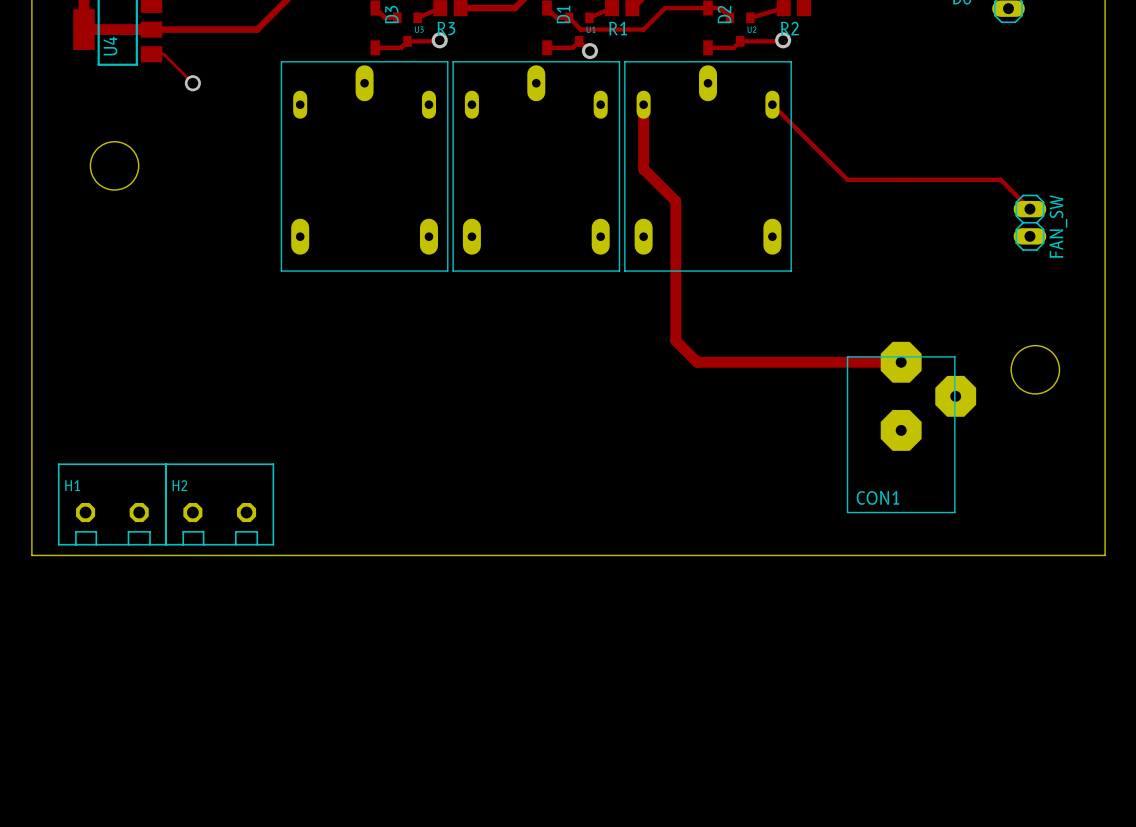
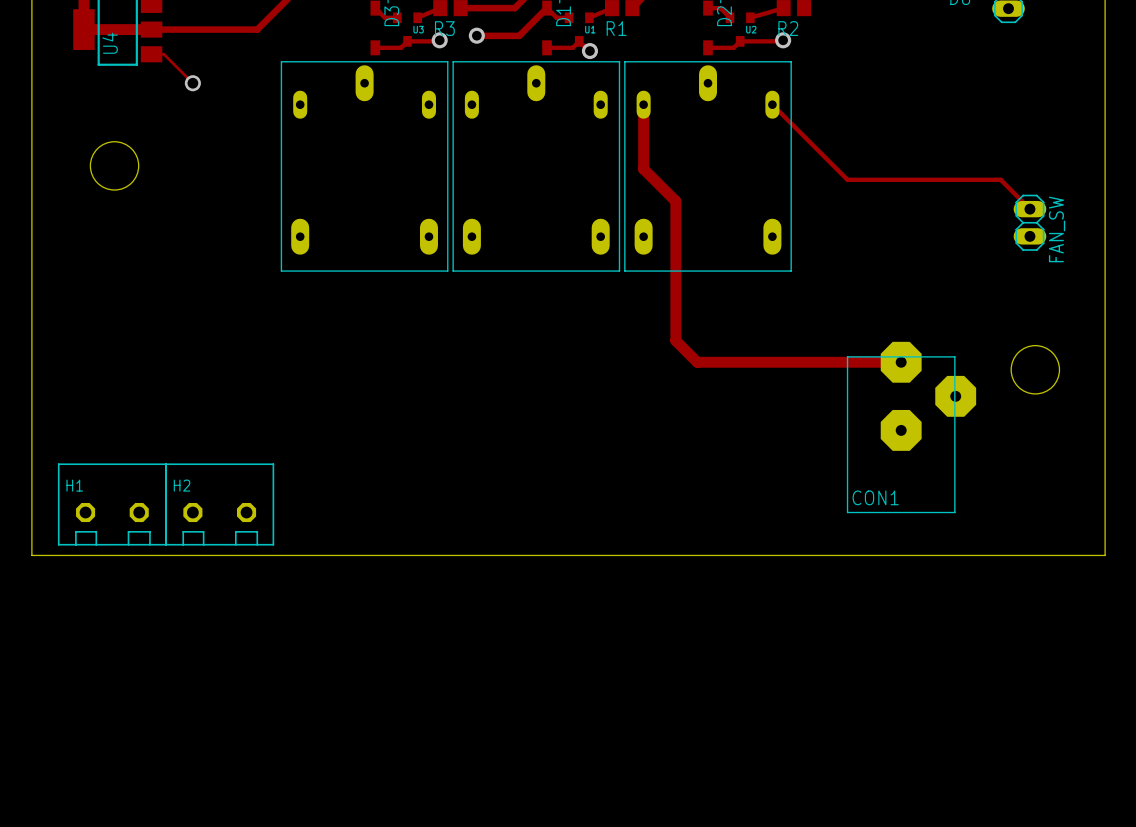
track: none -> (547, 8) (519, 35) (477, 35)
track: (708, 8) (665, 8) (643, 29) (580, 29) (569, 17) -> none
via: none -> (476, 35)

